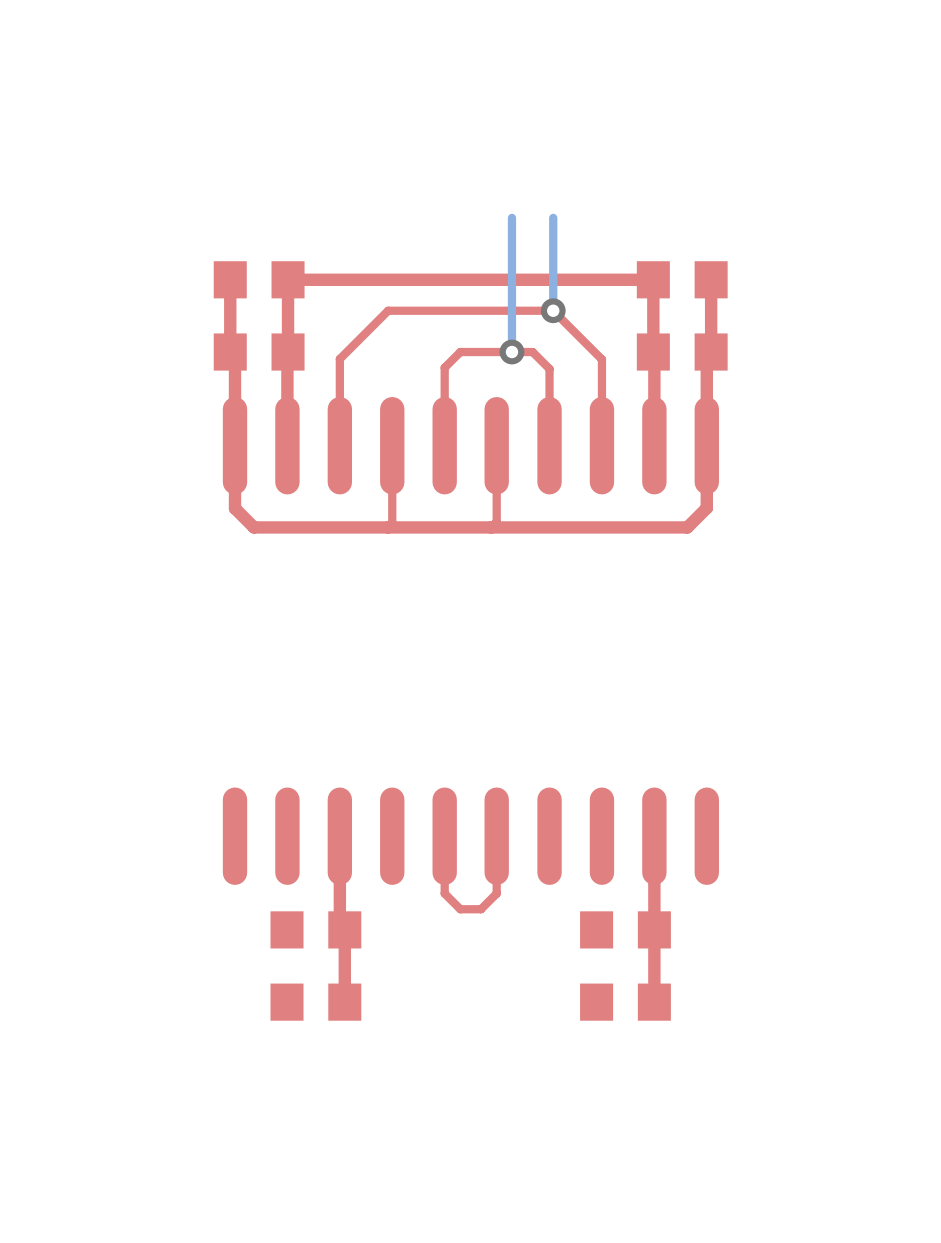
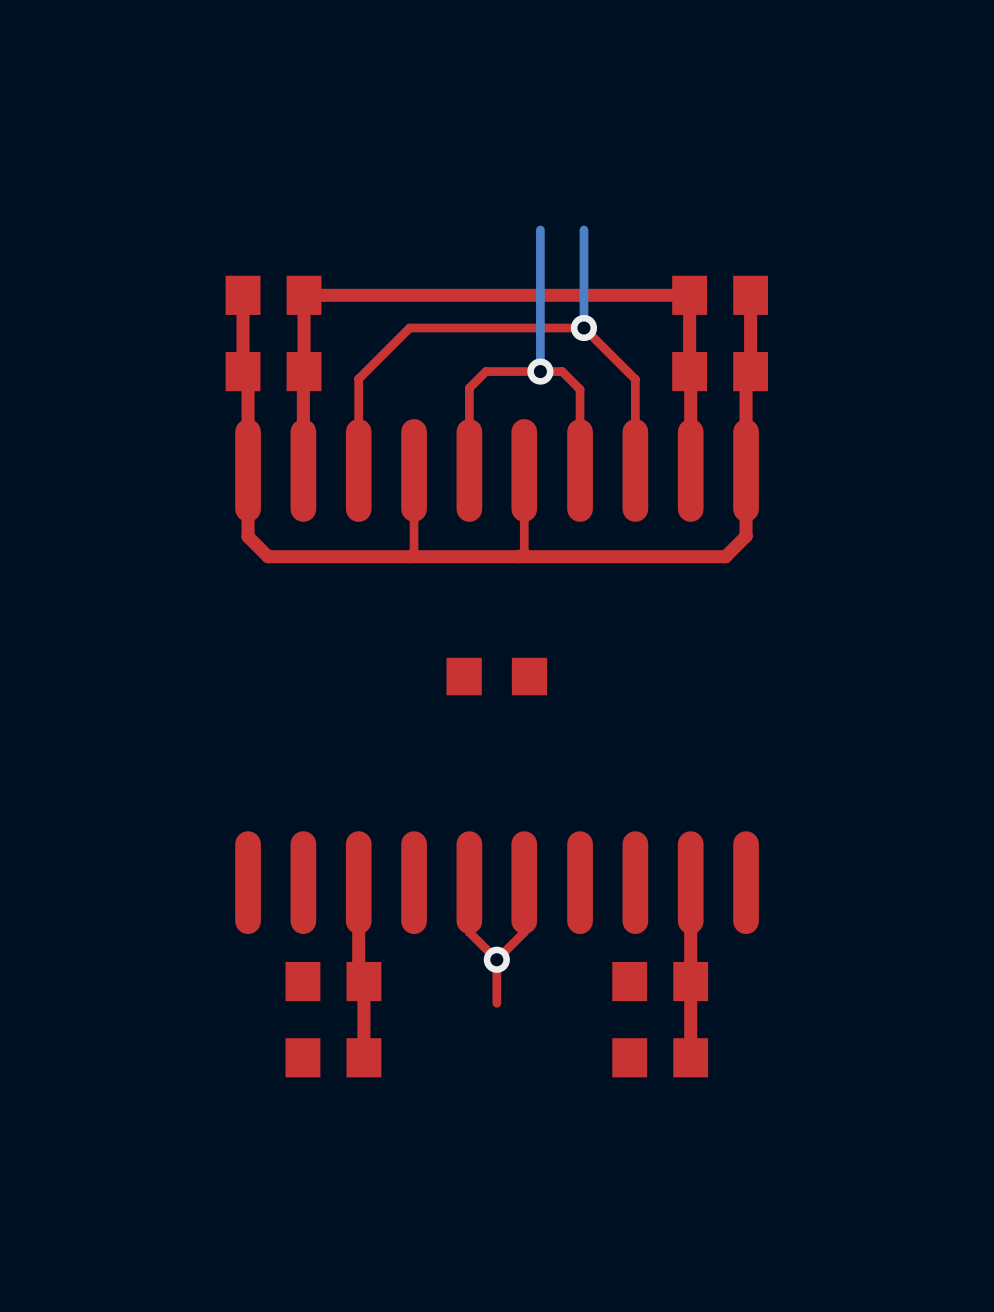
part: none -> (496, 676)
top track: none -> (469, 932) (496, 959)
top track: (496, 883) (496, 893) (481, 909) (460, 909) (444, 893) (444, 883) -> (524, 932) (496, 959)
top track: none -> (496, 959) (496, 1003)
via: none -> (496, 959)

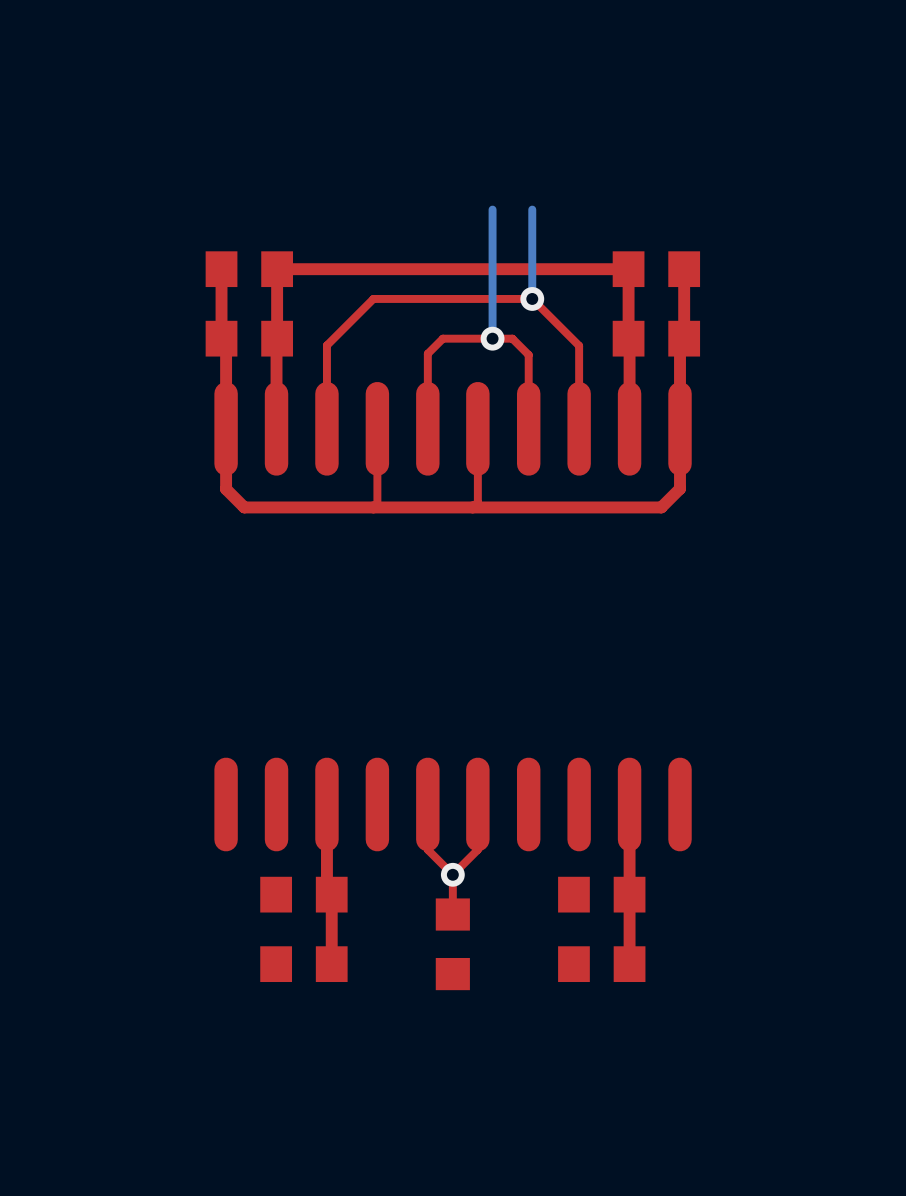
part rotation: 0° (496, 676) -> 90° clockwise (452, 944)
part position: (496, 676) -> (452, 944)

